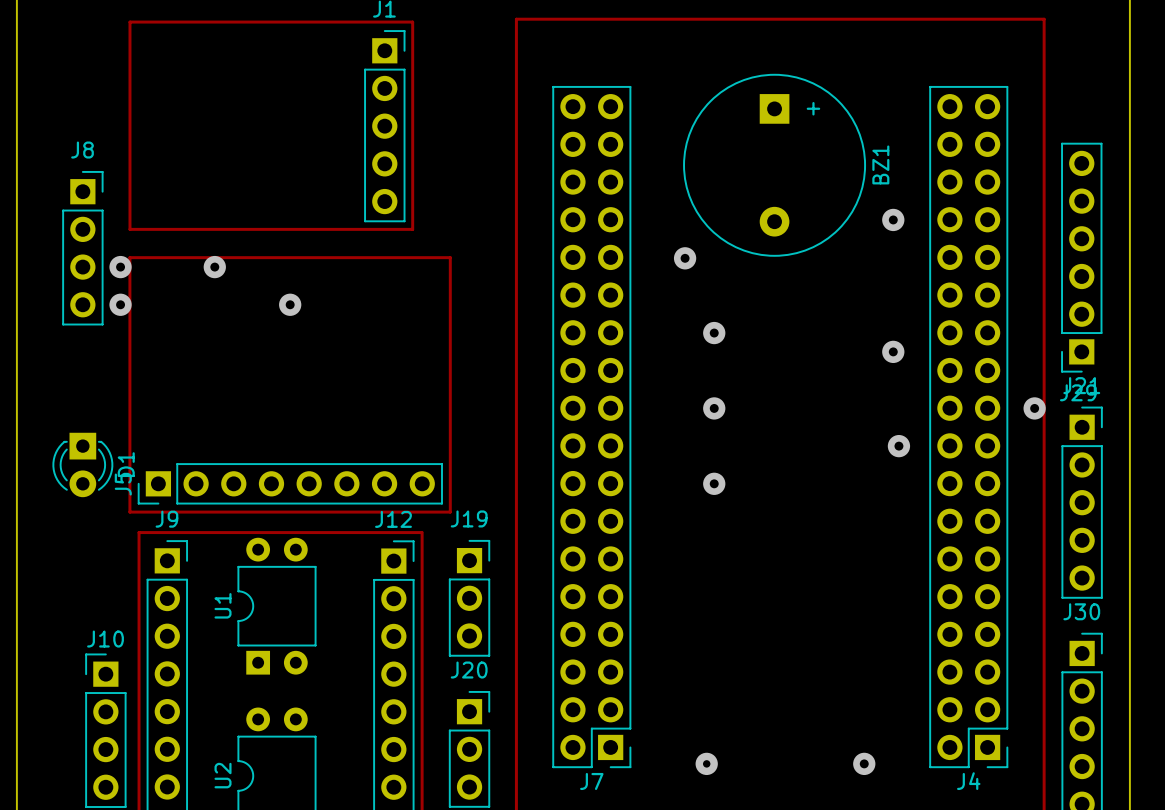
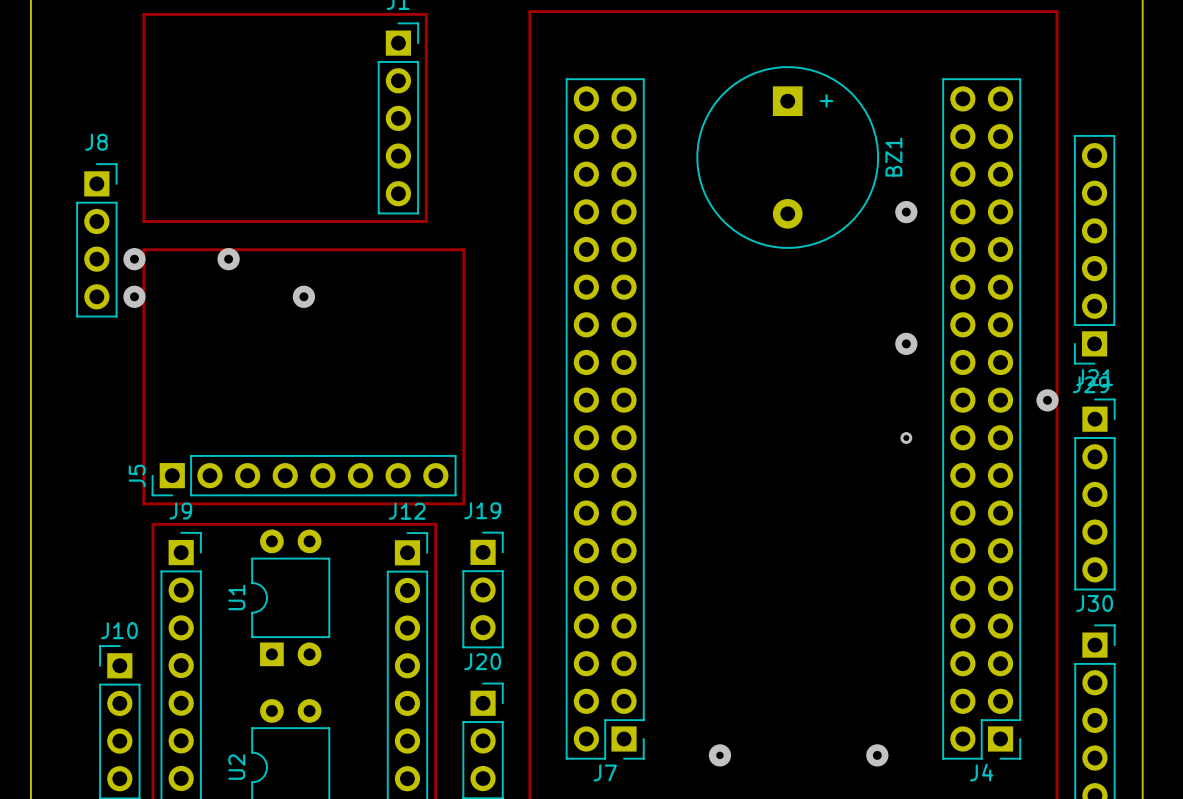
via: (685, 258) -> none
via: (714, 333) -> none
via: (714, 408) -> none
via size: [887, 434, 911, 458] -> [900, 432, 913, 444]
D1: (82, 464) -> none
via: (714, 483) -> none

